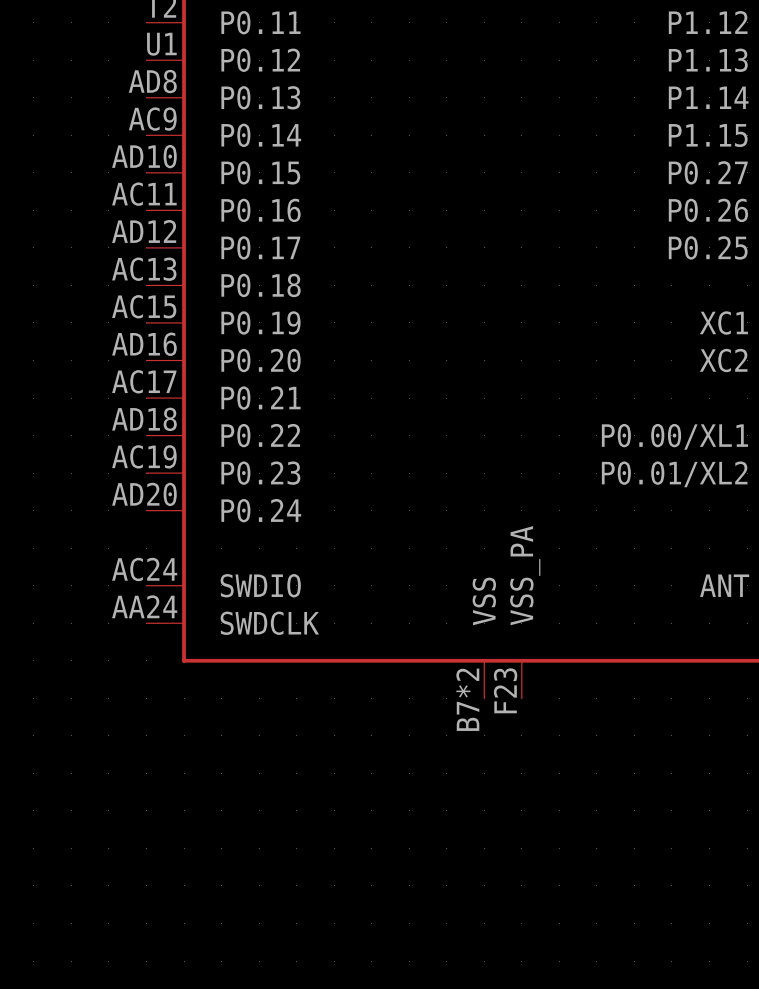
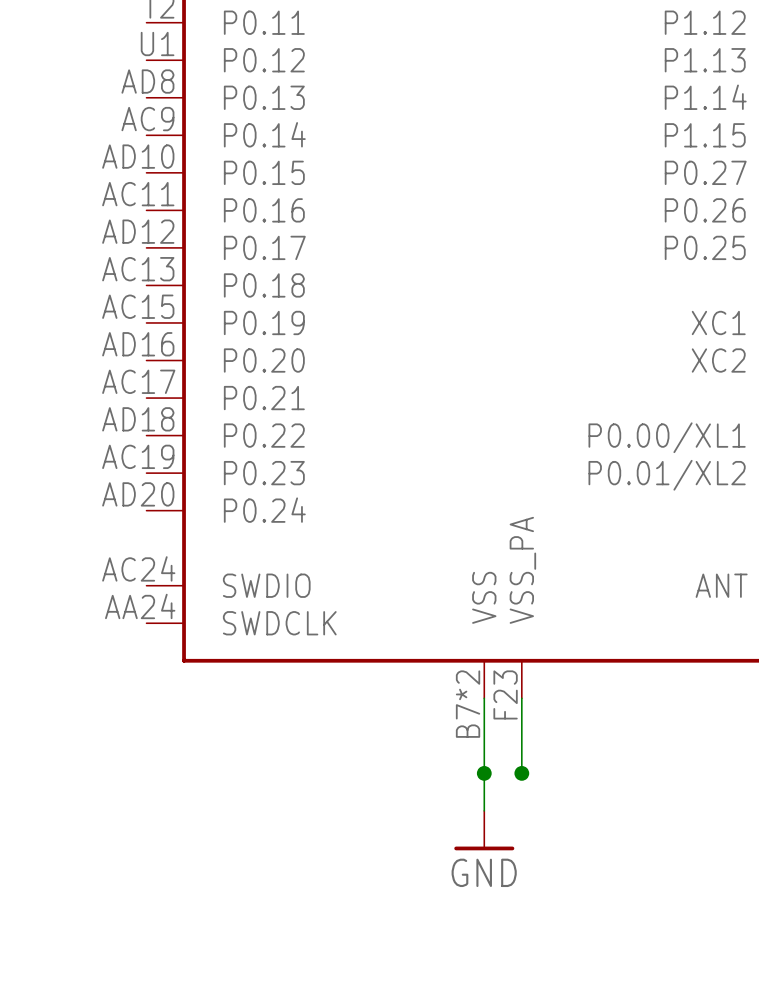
wire: none -> (484, 698) (484, 810)
wire: none -> (521, 698) (521, 773)
junction: none -> (484, 773)
junction: none -> (521, 773)
power symbol: none -> GND (484, 830)

